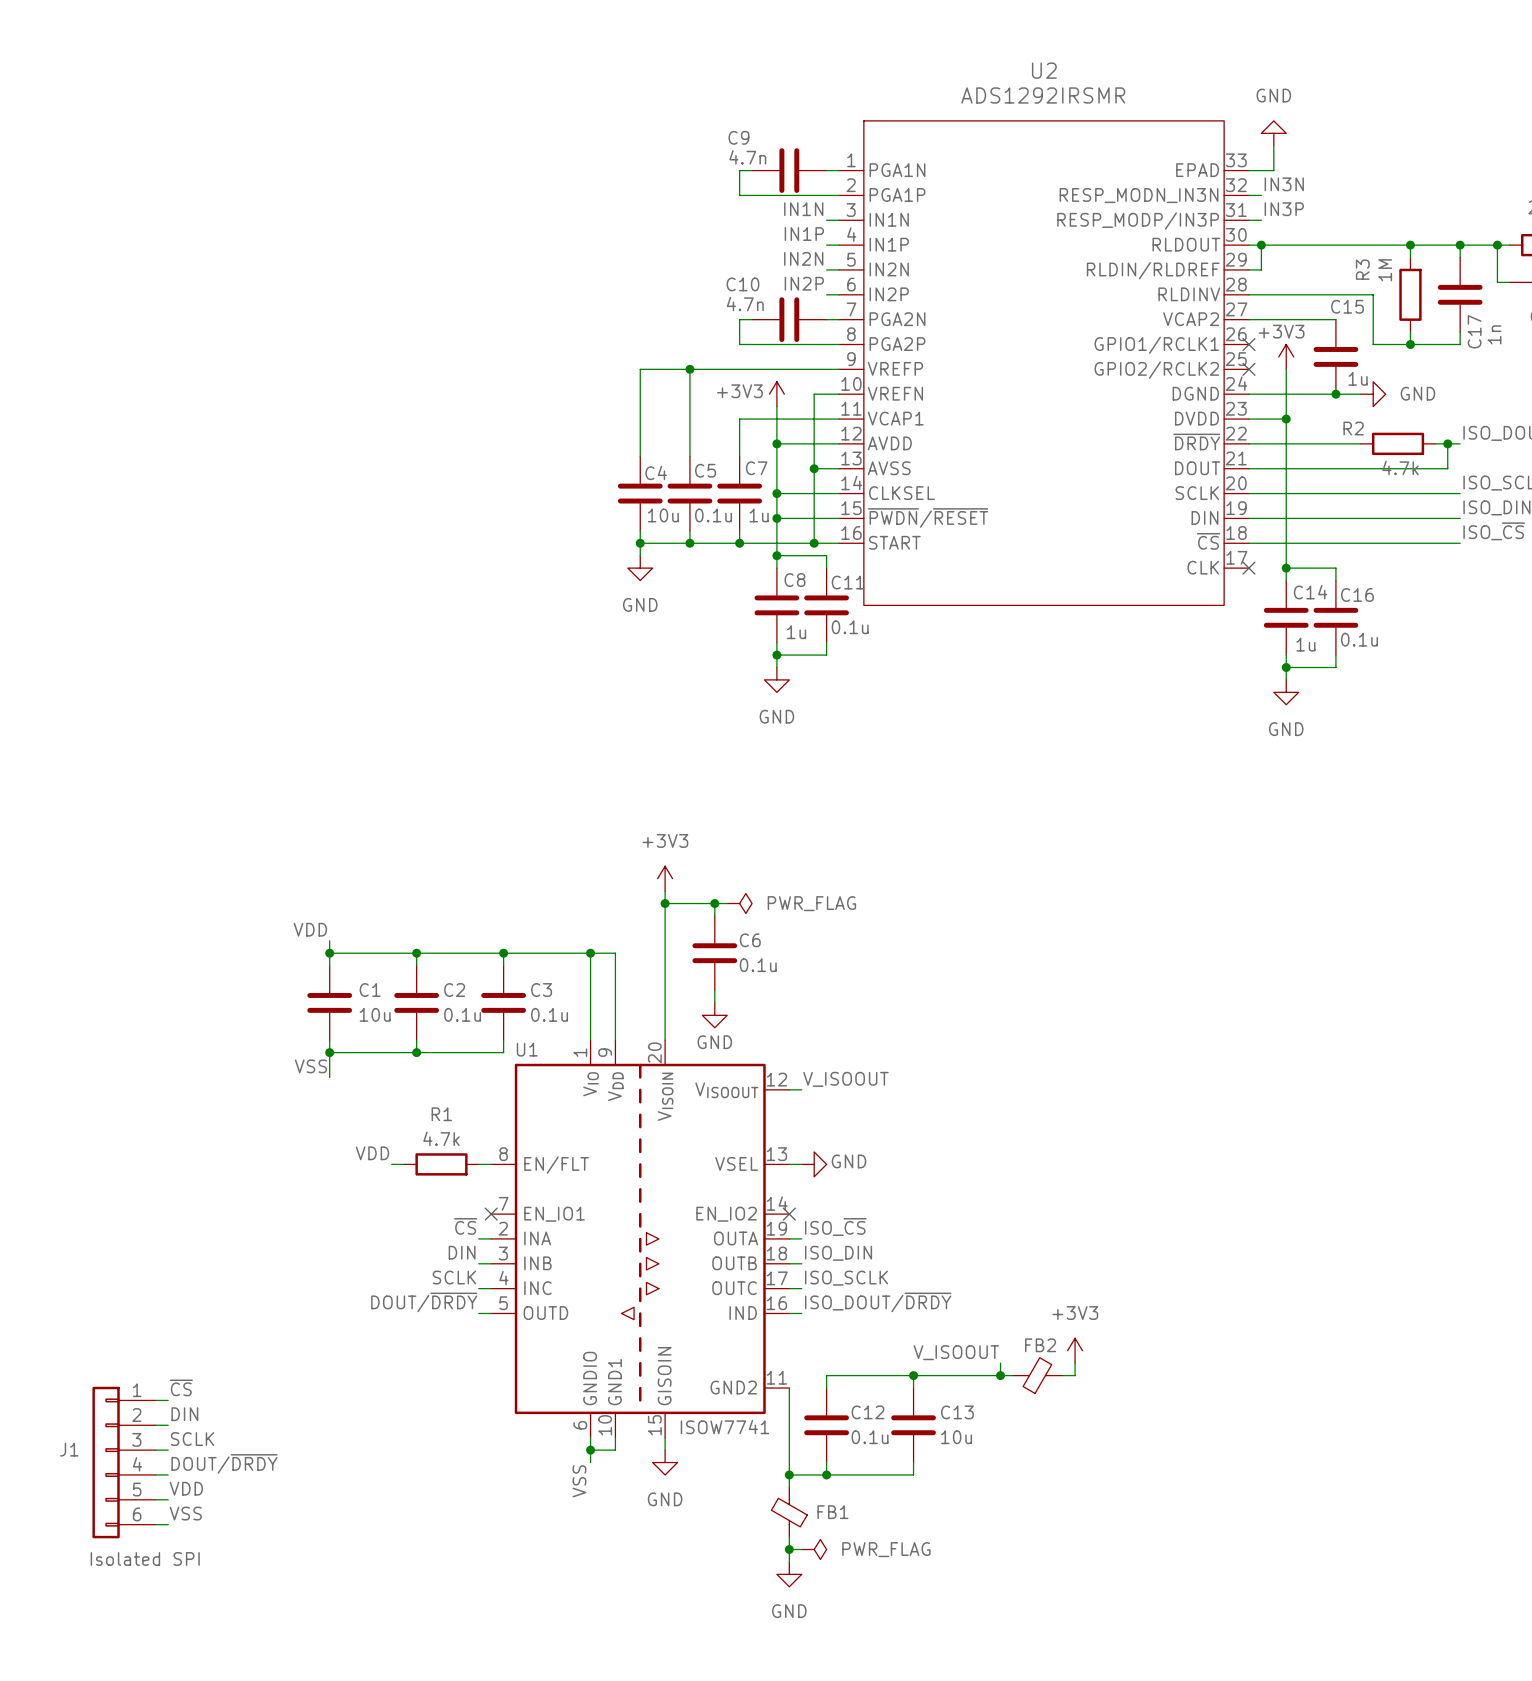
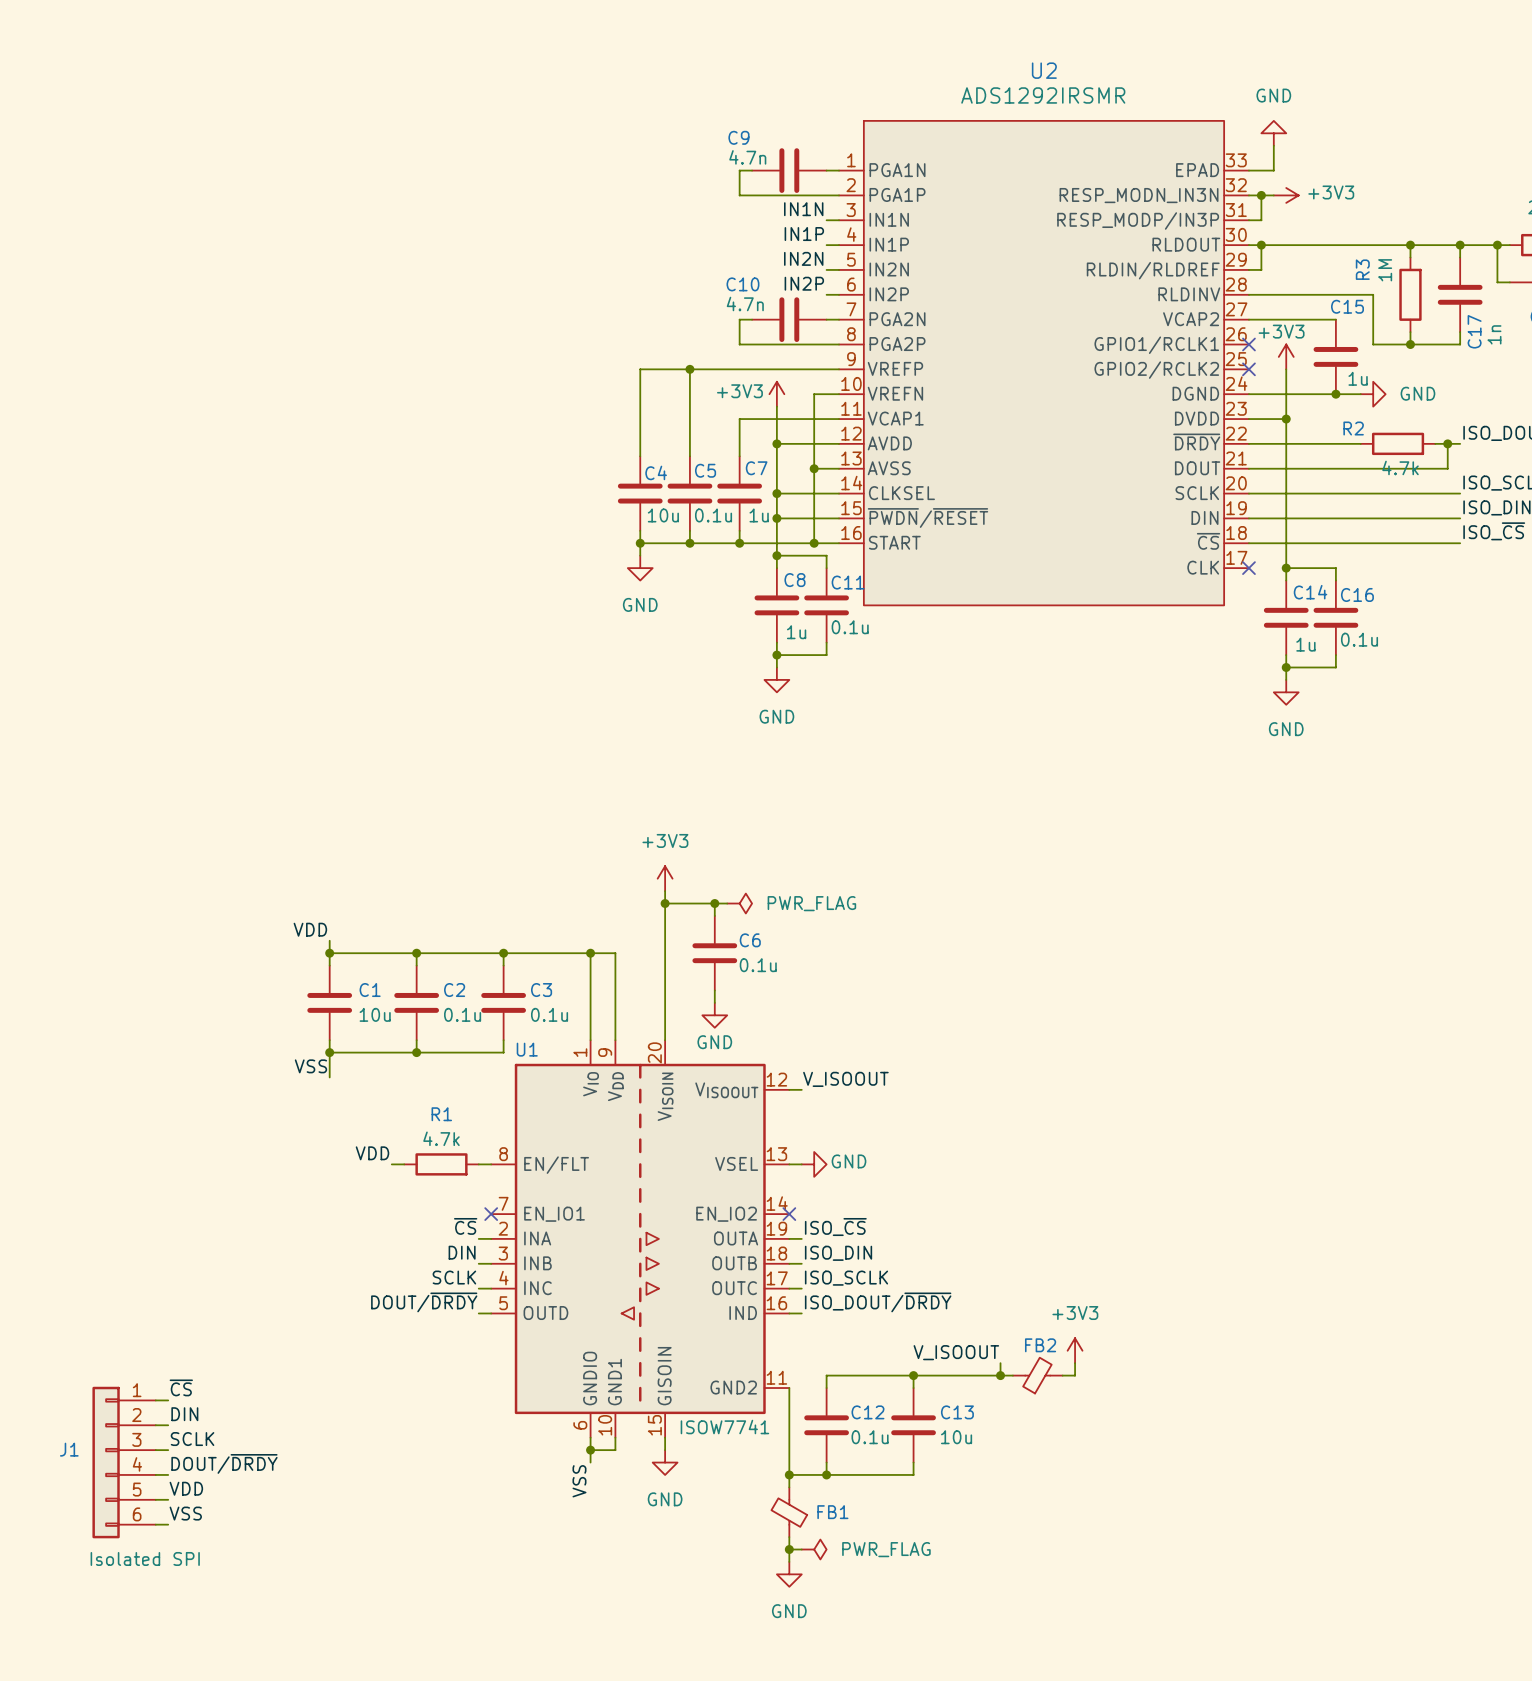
label: IN3N (1284, 184) -> none
junction: none -> (1261, 195)
wire: none -> (1273, 195) (1261, 195) (1261, 220)
power symbol: none -> +3V3 (1286, 195)
label: IN3P (1284, 209) -> none

